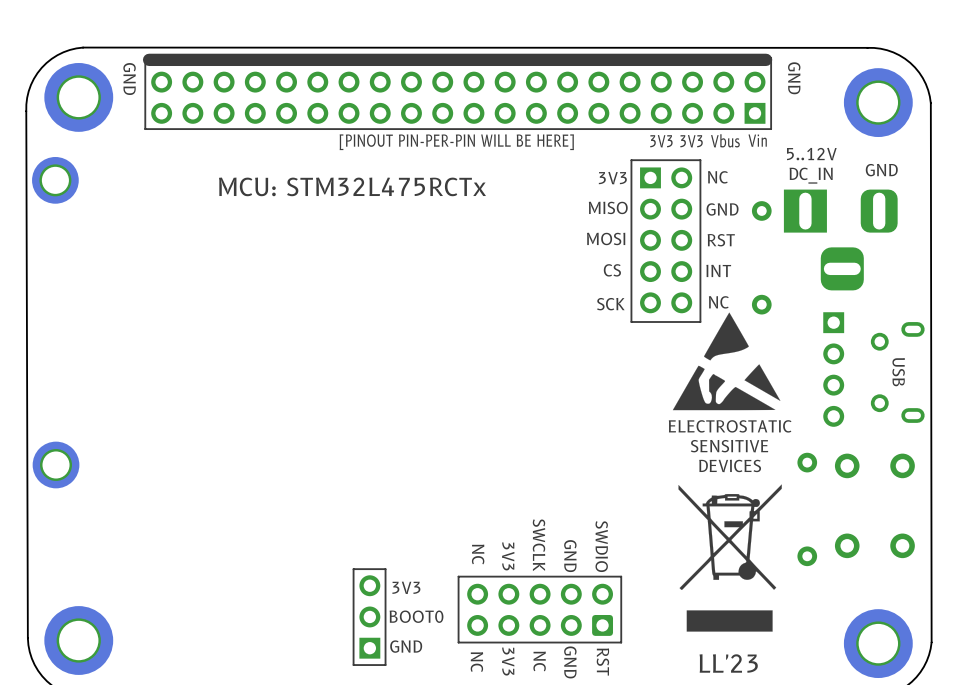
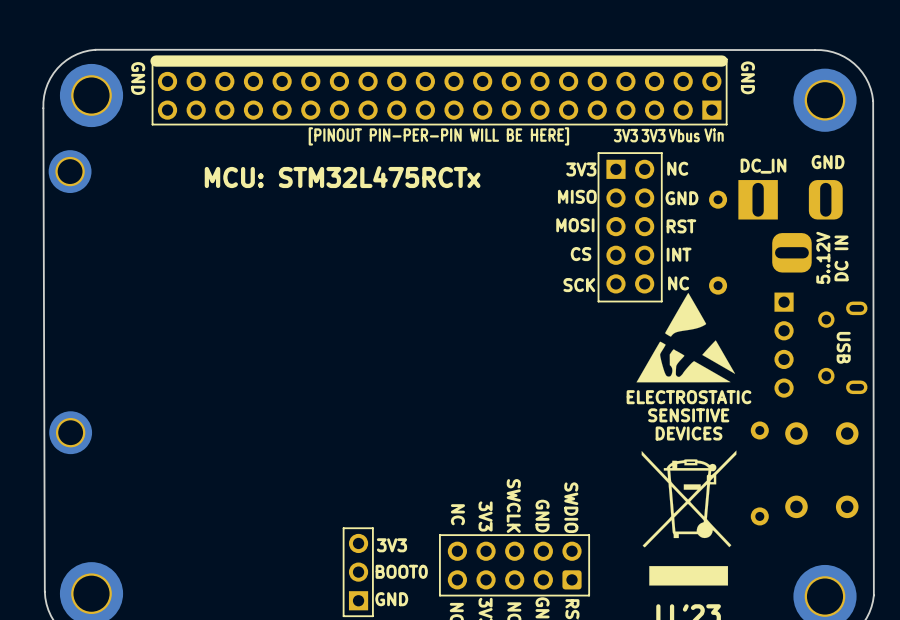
text rotation: 0° (811, 154) -> 90° counterclockwise (823, 257)
text position: 5..12V (811, 154) -> 5..12V (823, 257)
text: none -> DC IN (841, 258)

